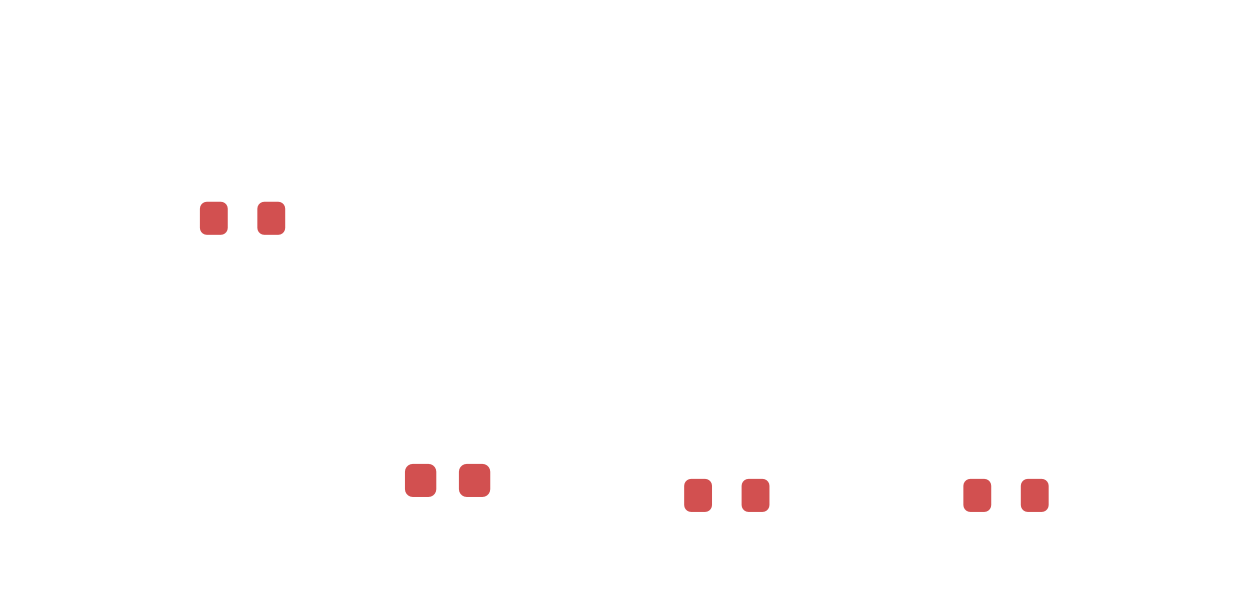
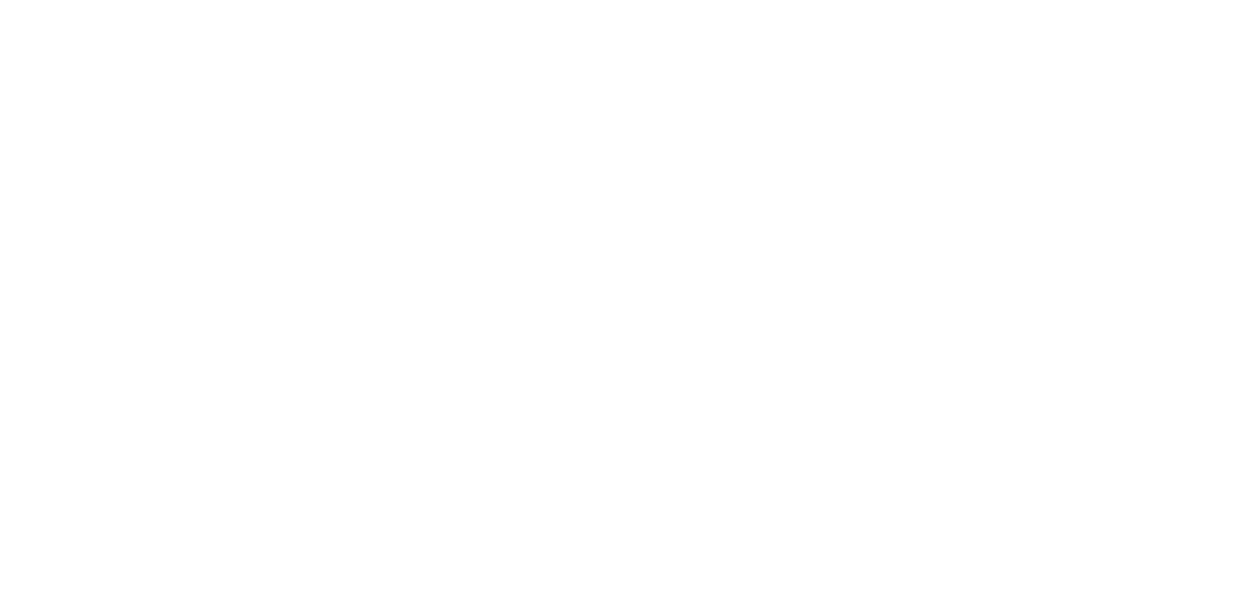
part: (242, 218) -> none
part: (447, 480) -> none
part: (726, 495) -> none
part: (1006, 495) -> none

